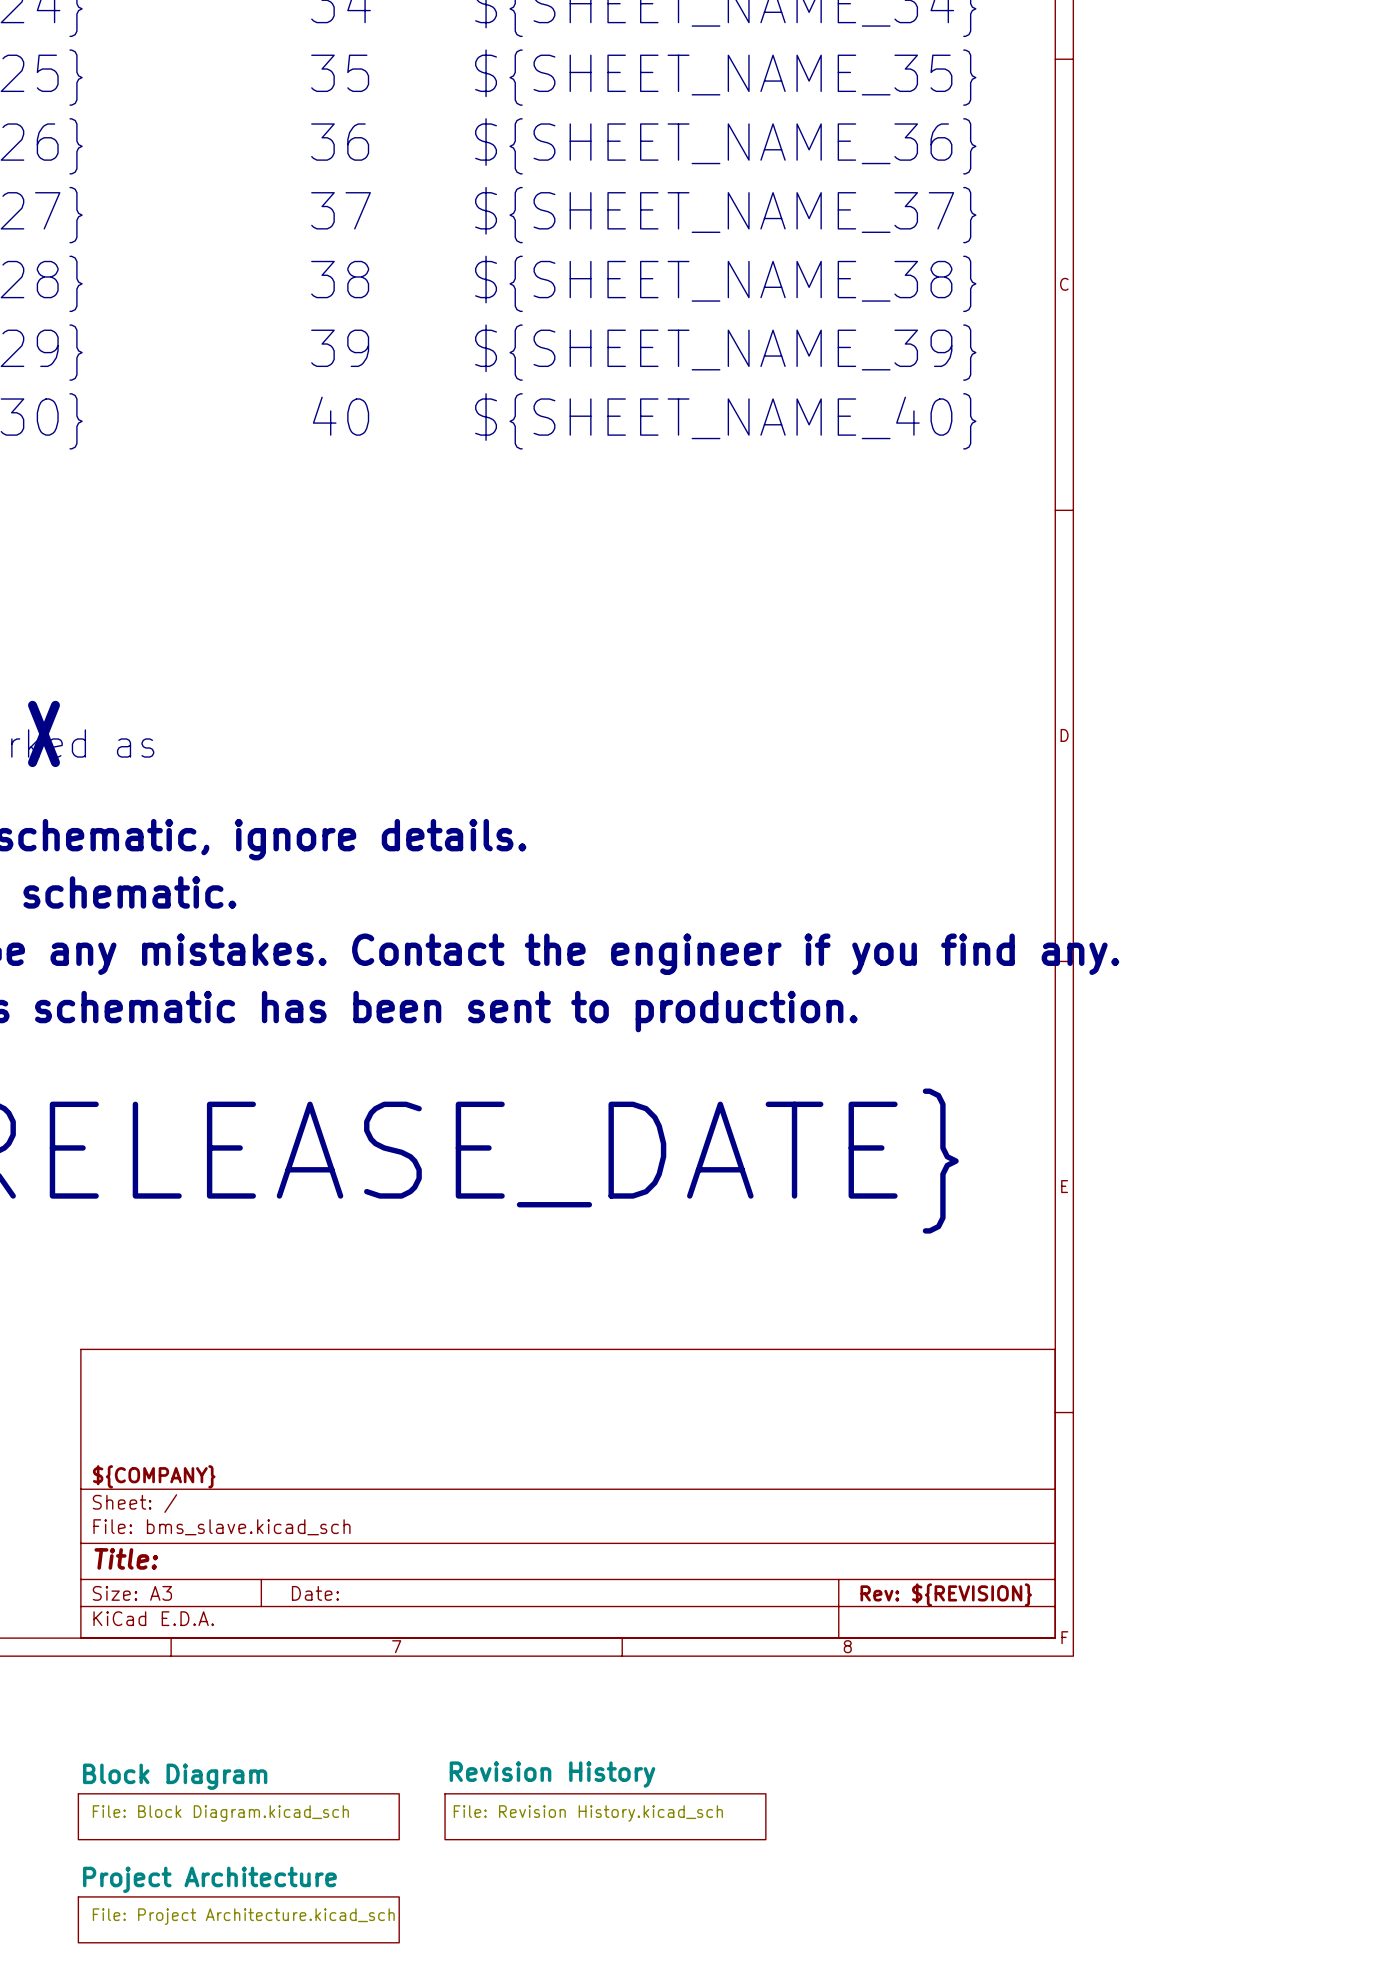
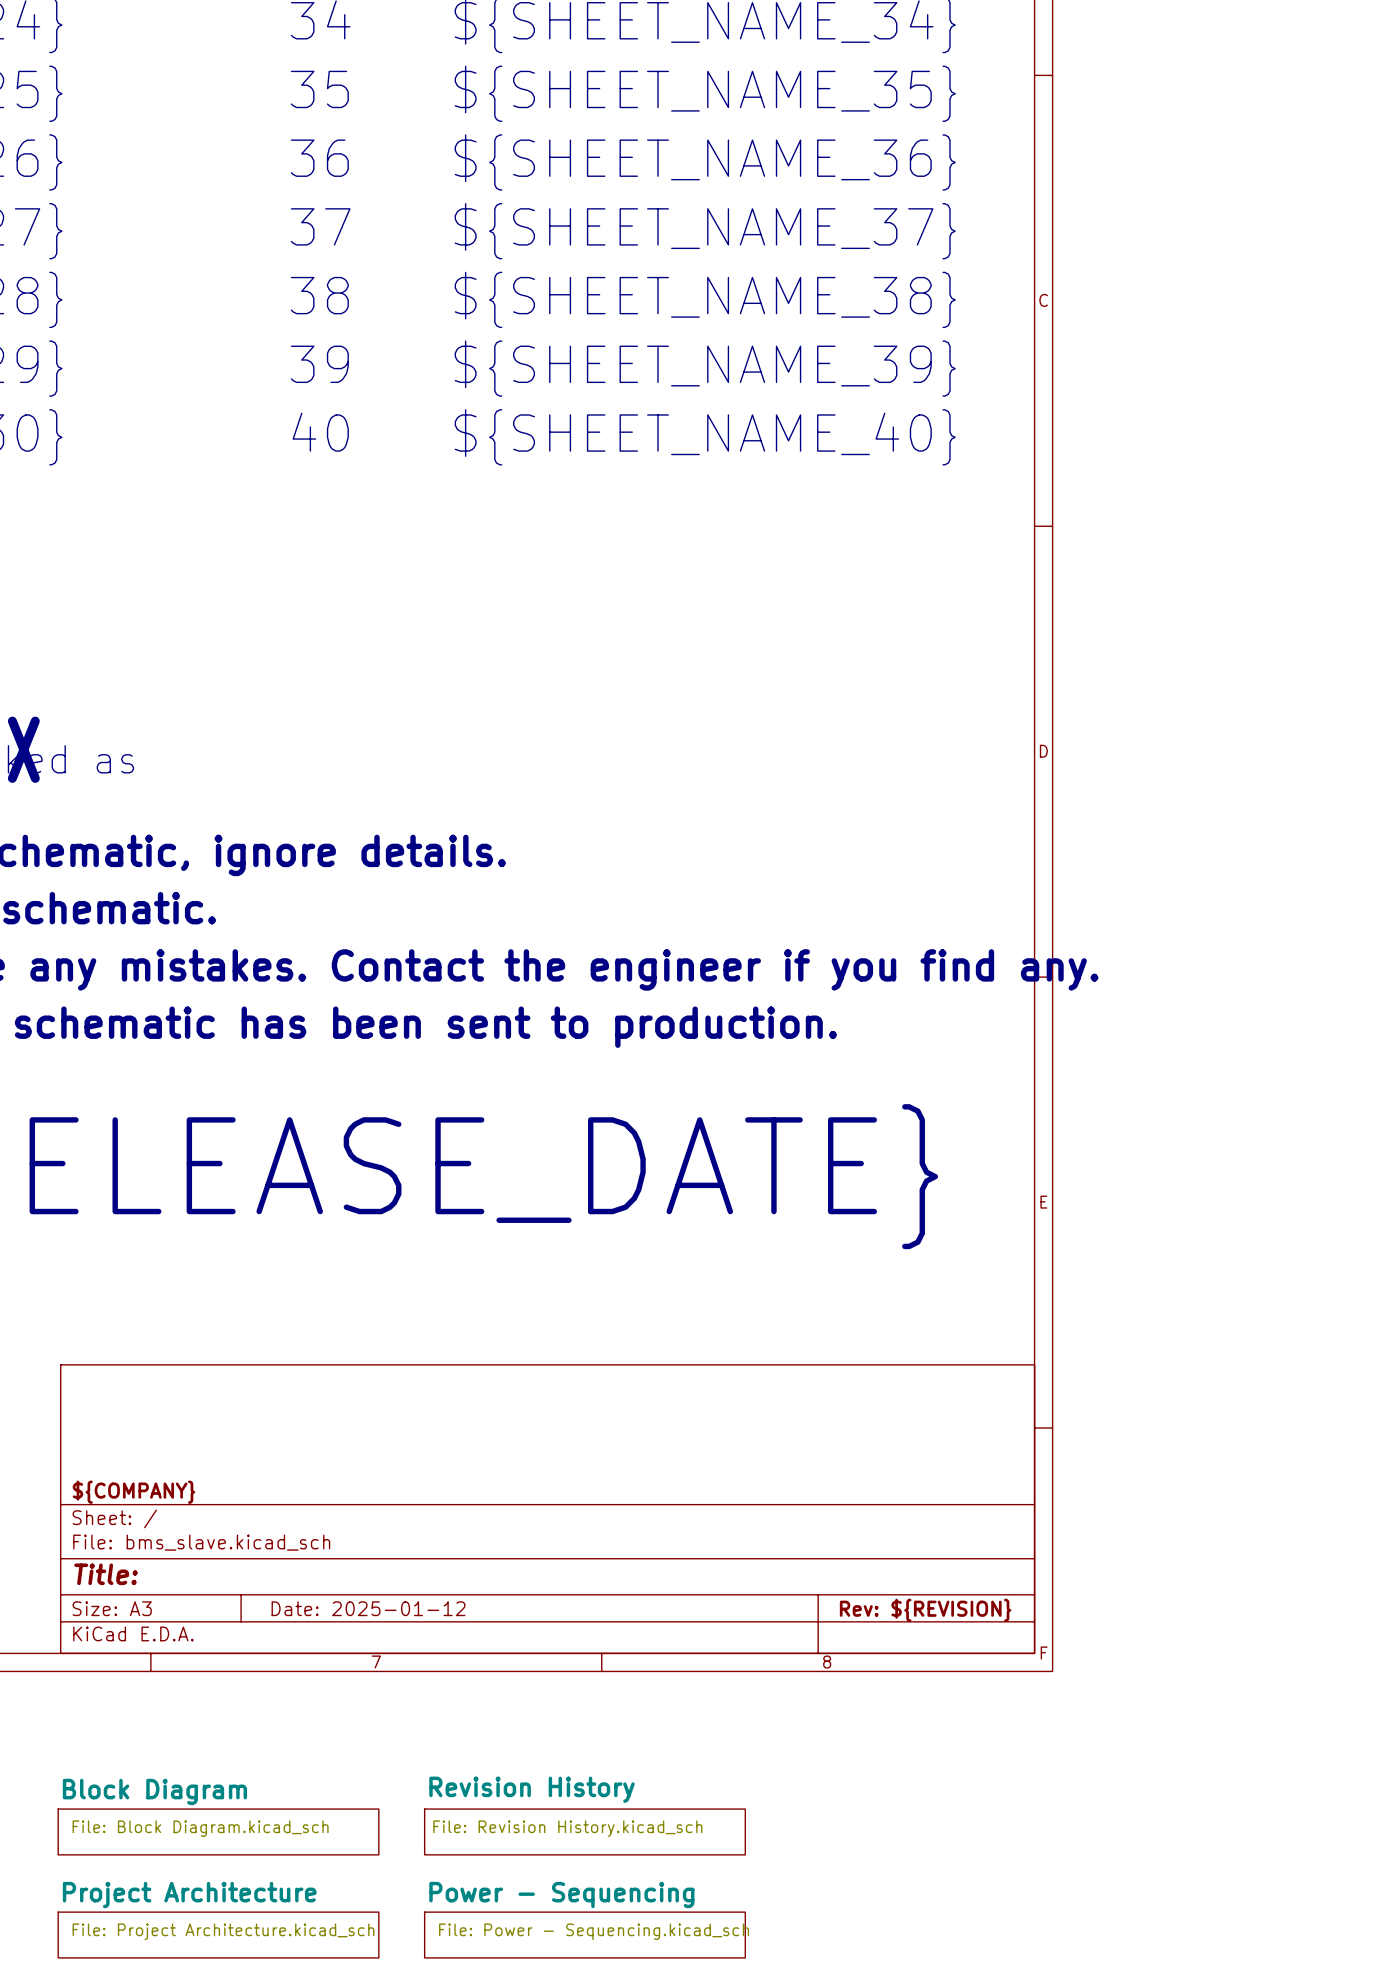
title block: Date: (315, 1593) -> Date: 2025-01-12 (368, 1608)
sheet Power - Sequencing: none -> File: Power - Sequencing.kicad_sch (584, 1935)

